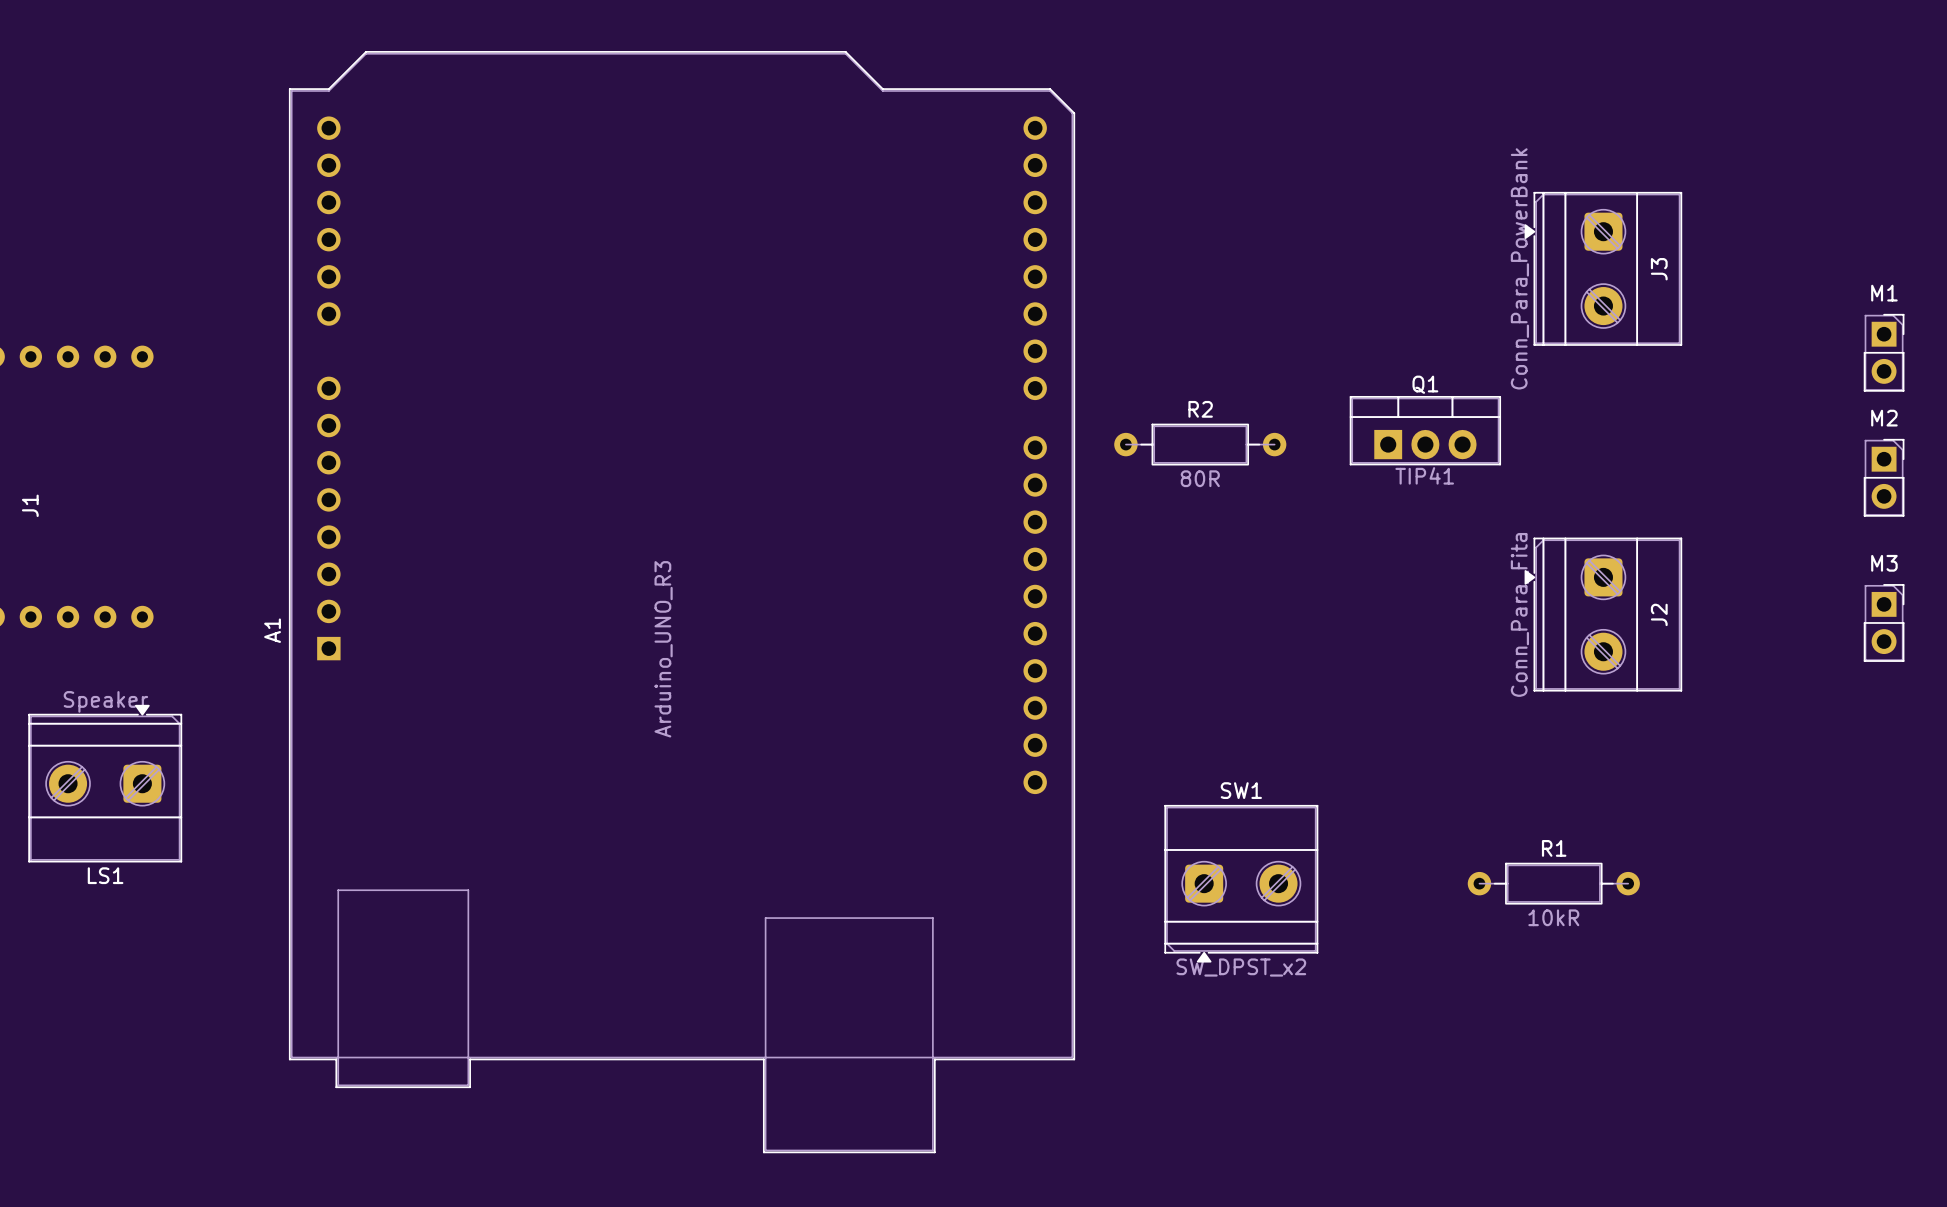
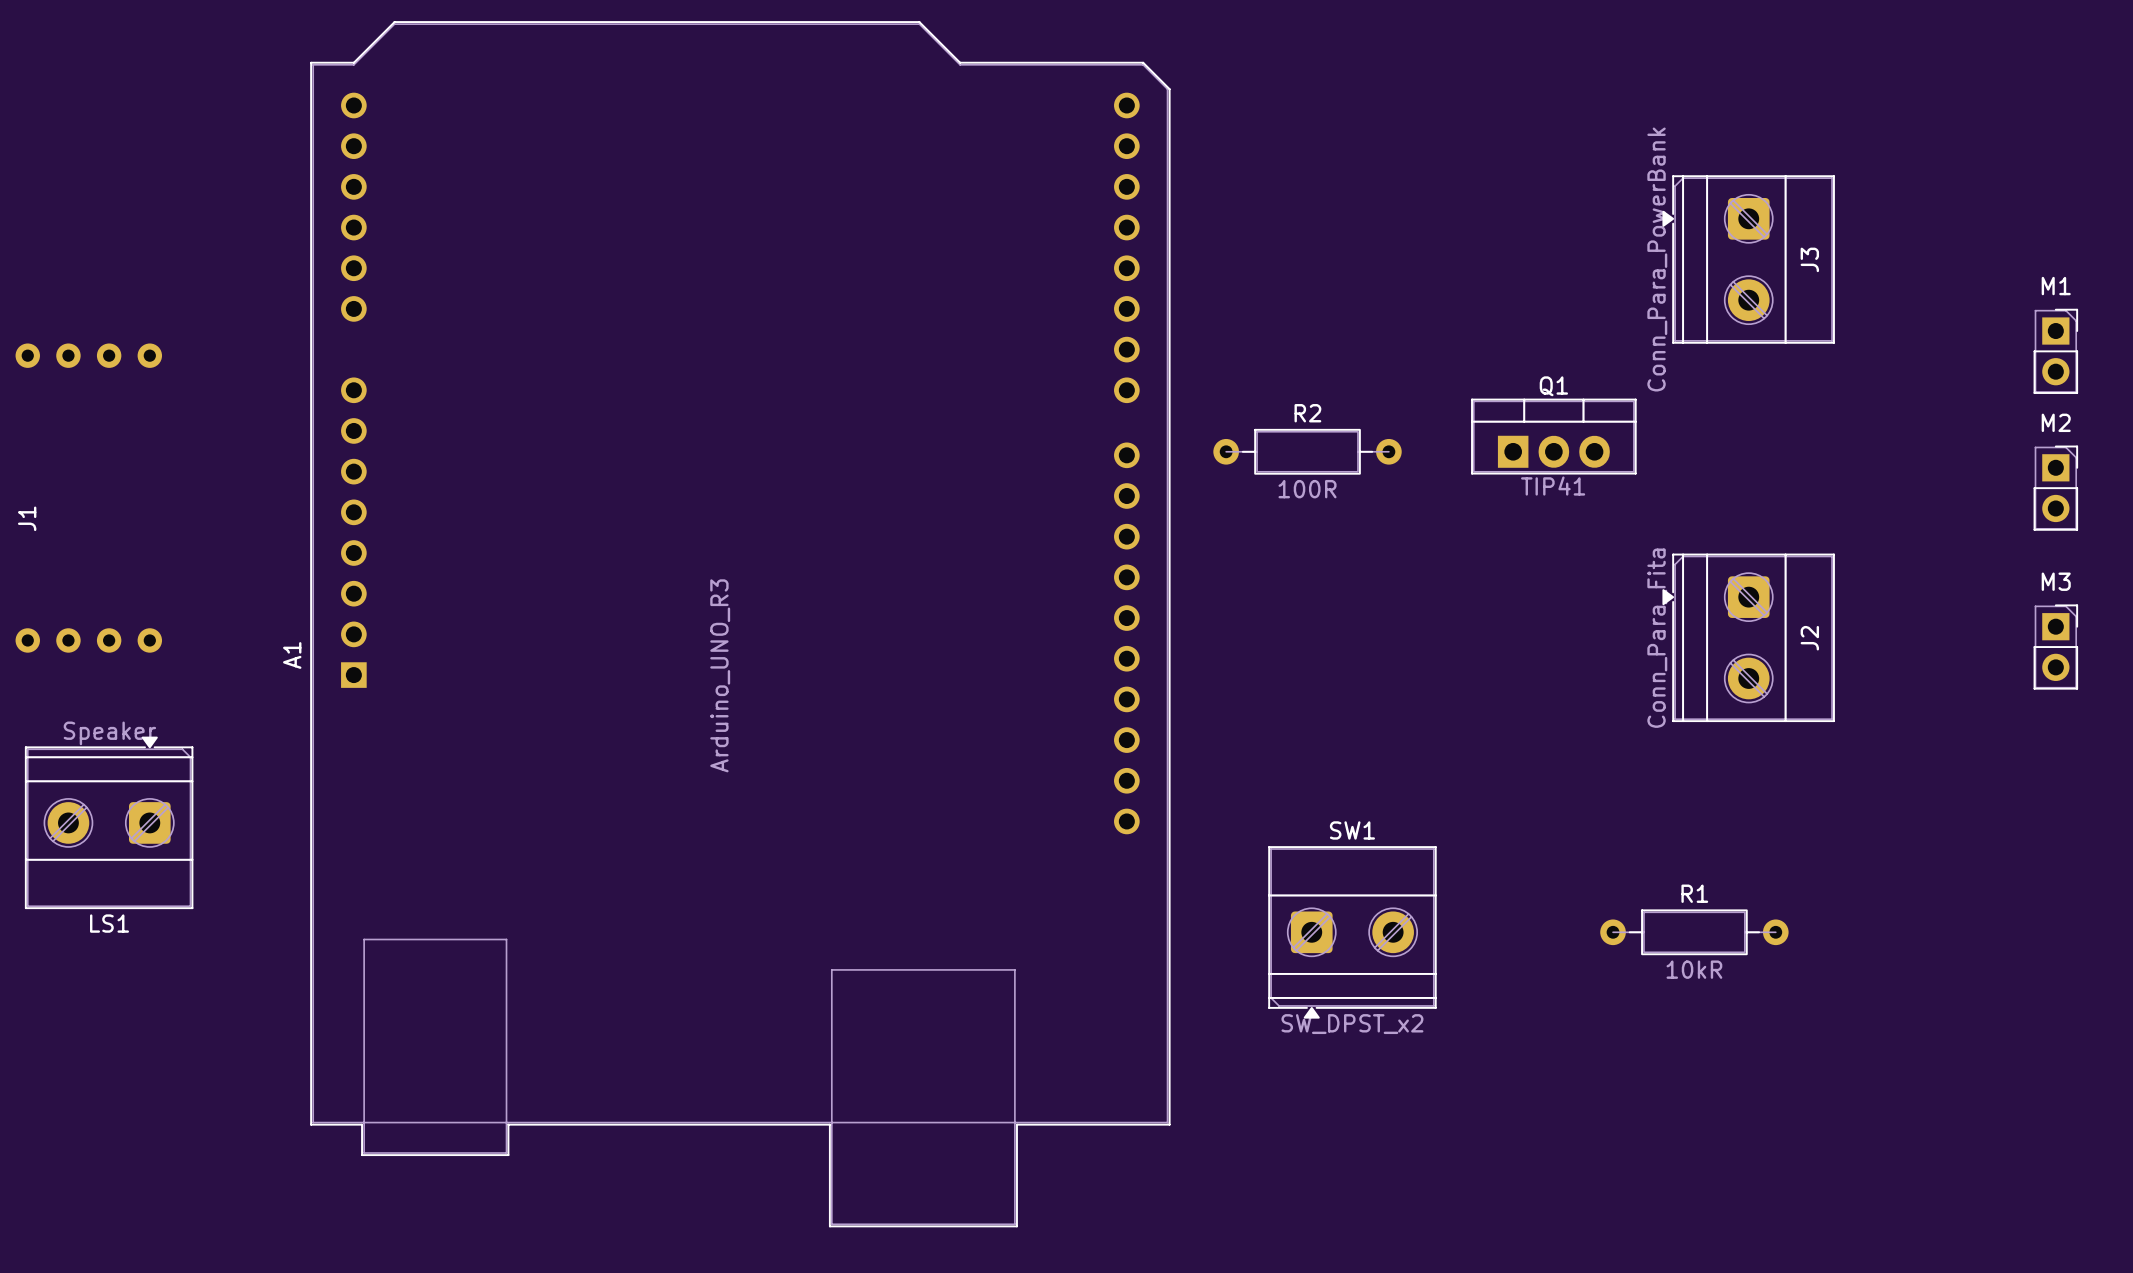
R2 value: 80R (1200, 478) -> 100R (1307, 489)

